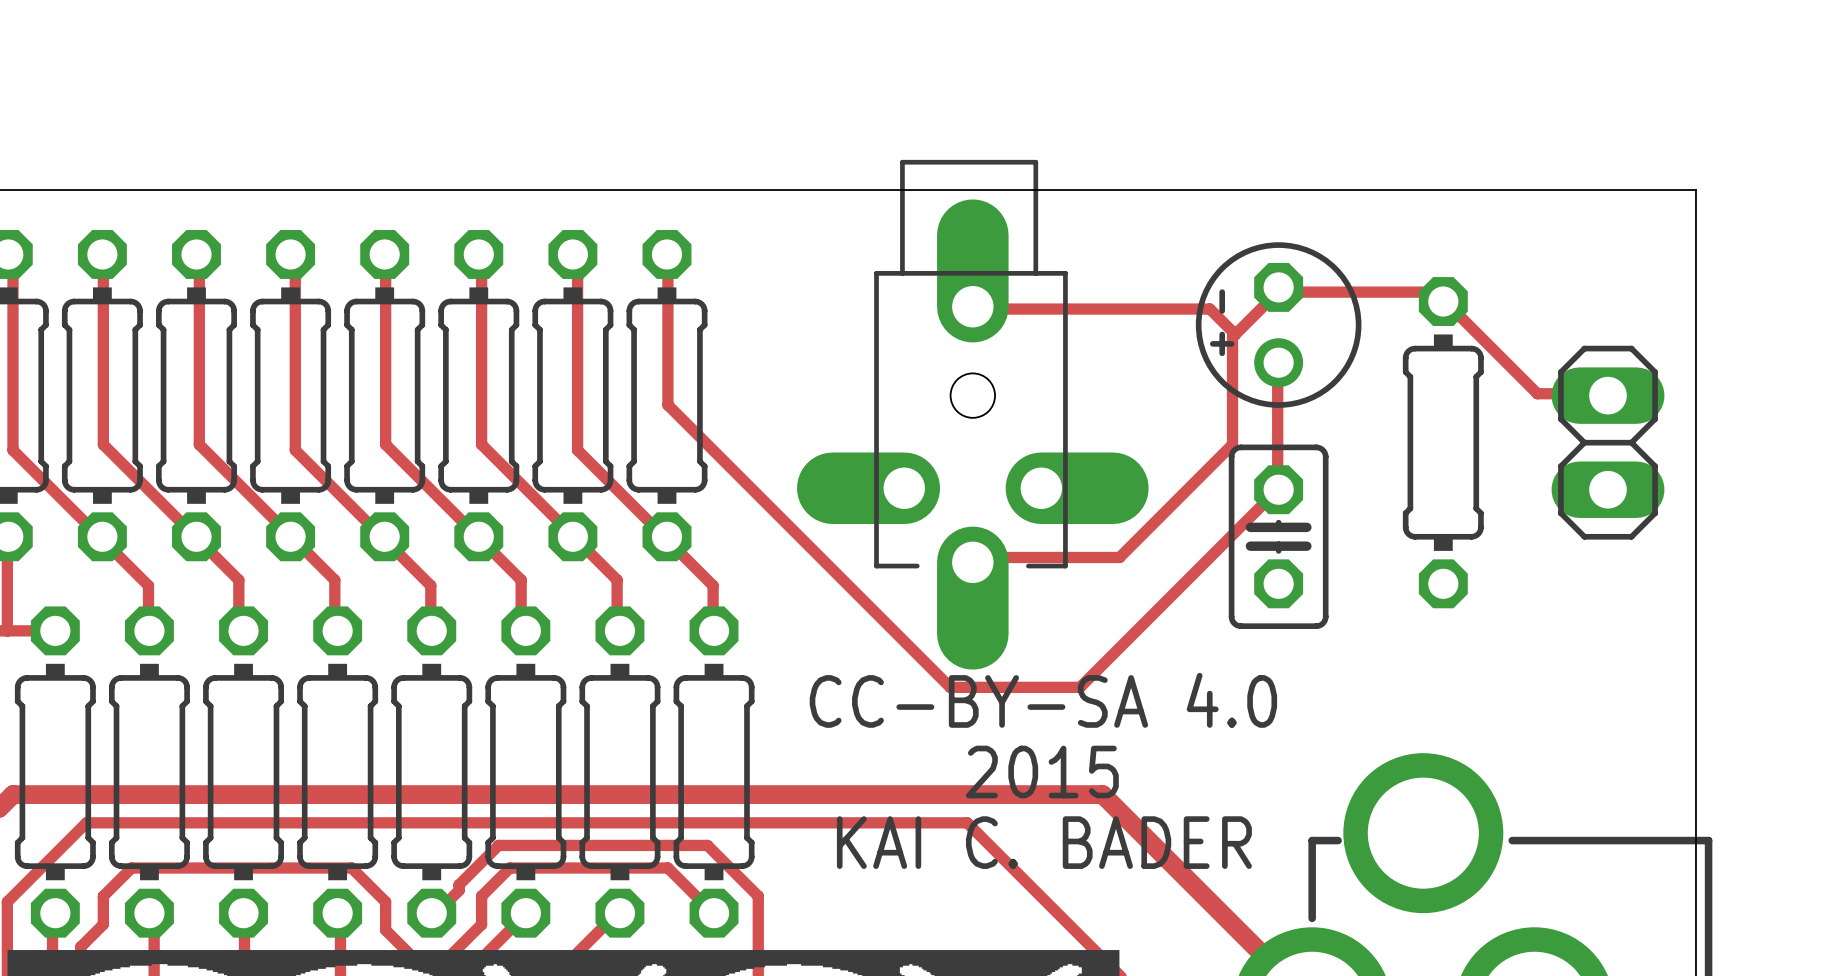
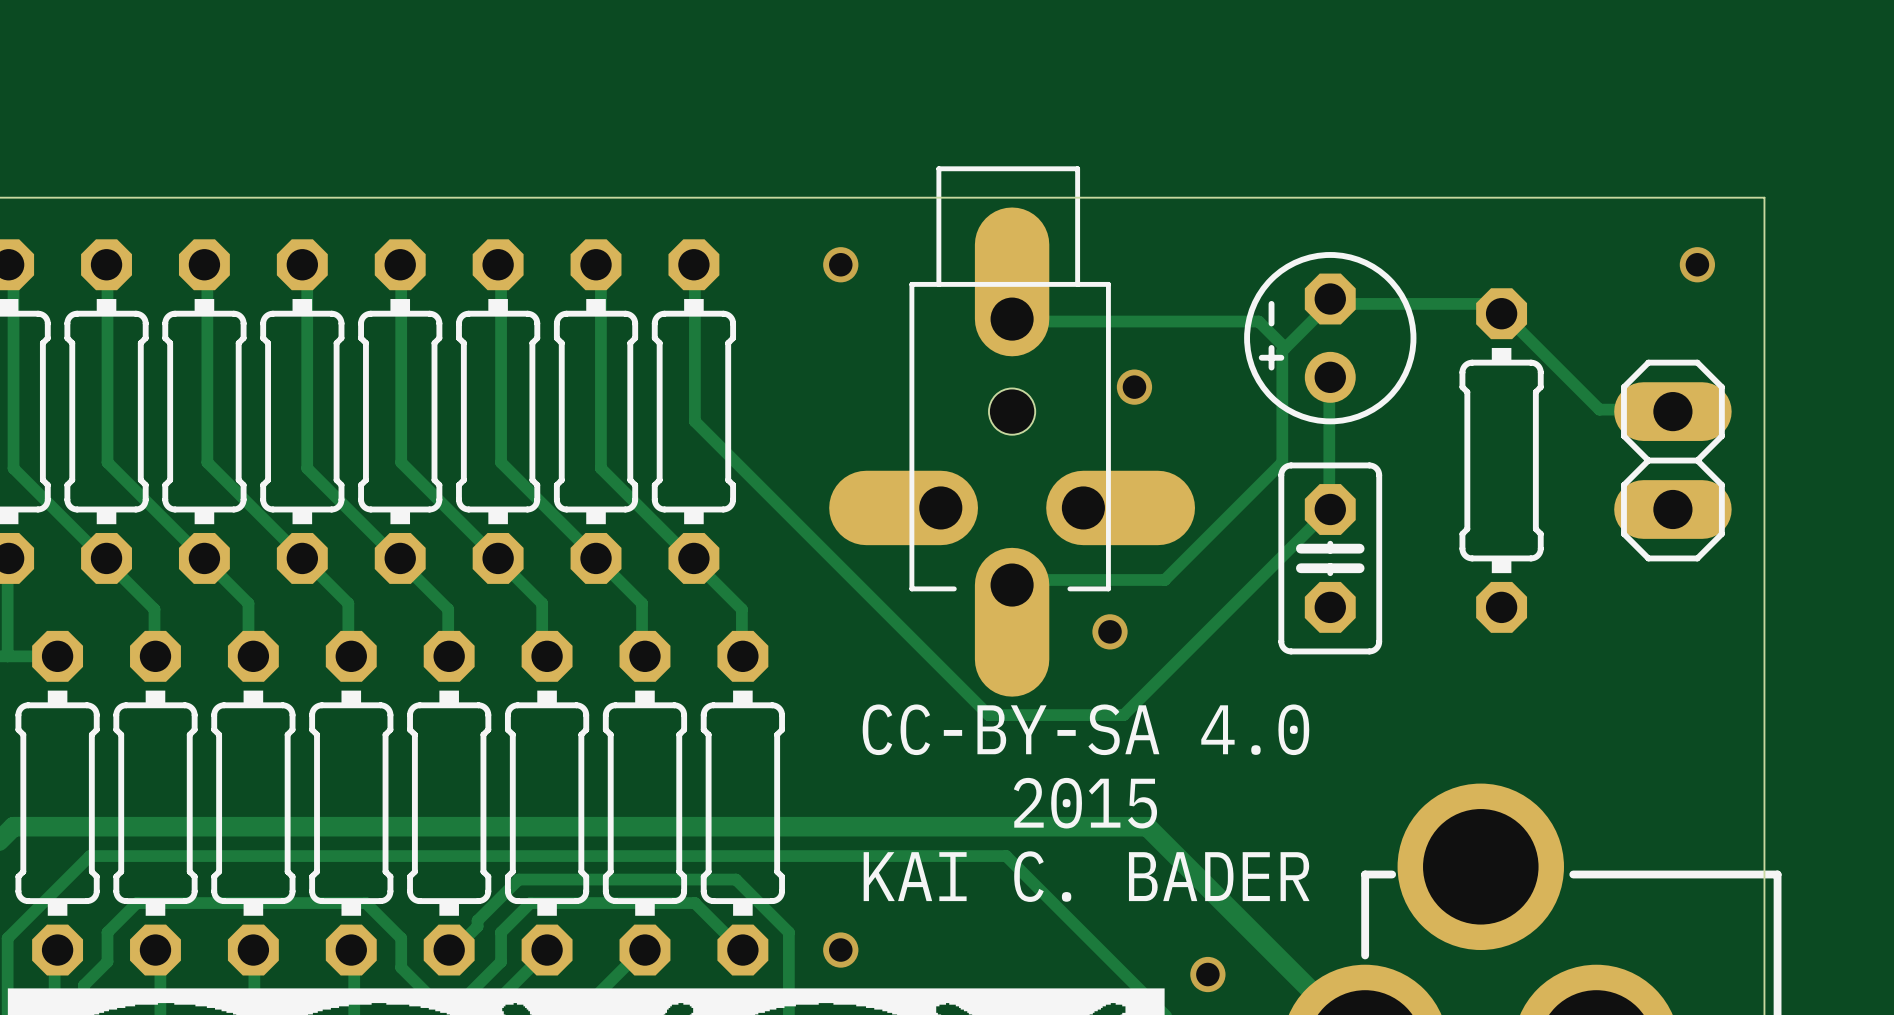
via: none -> (840, 264)
via: none -> (1697, 264)
via: none -> (1134, 387)
via: none -> (1109, 631)
via: none -> (840, 950)
via: none -> (1207, 974)

